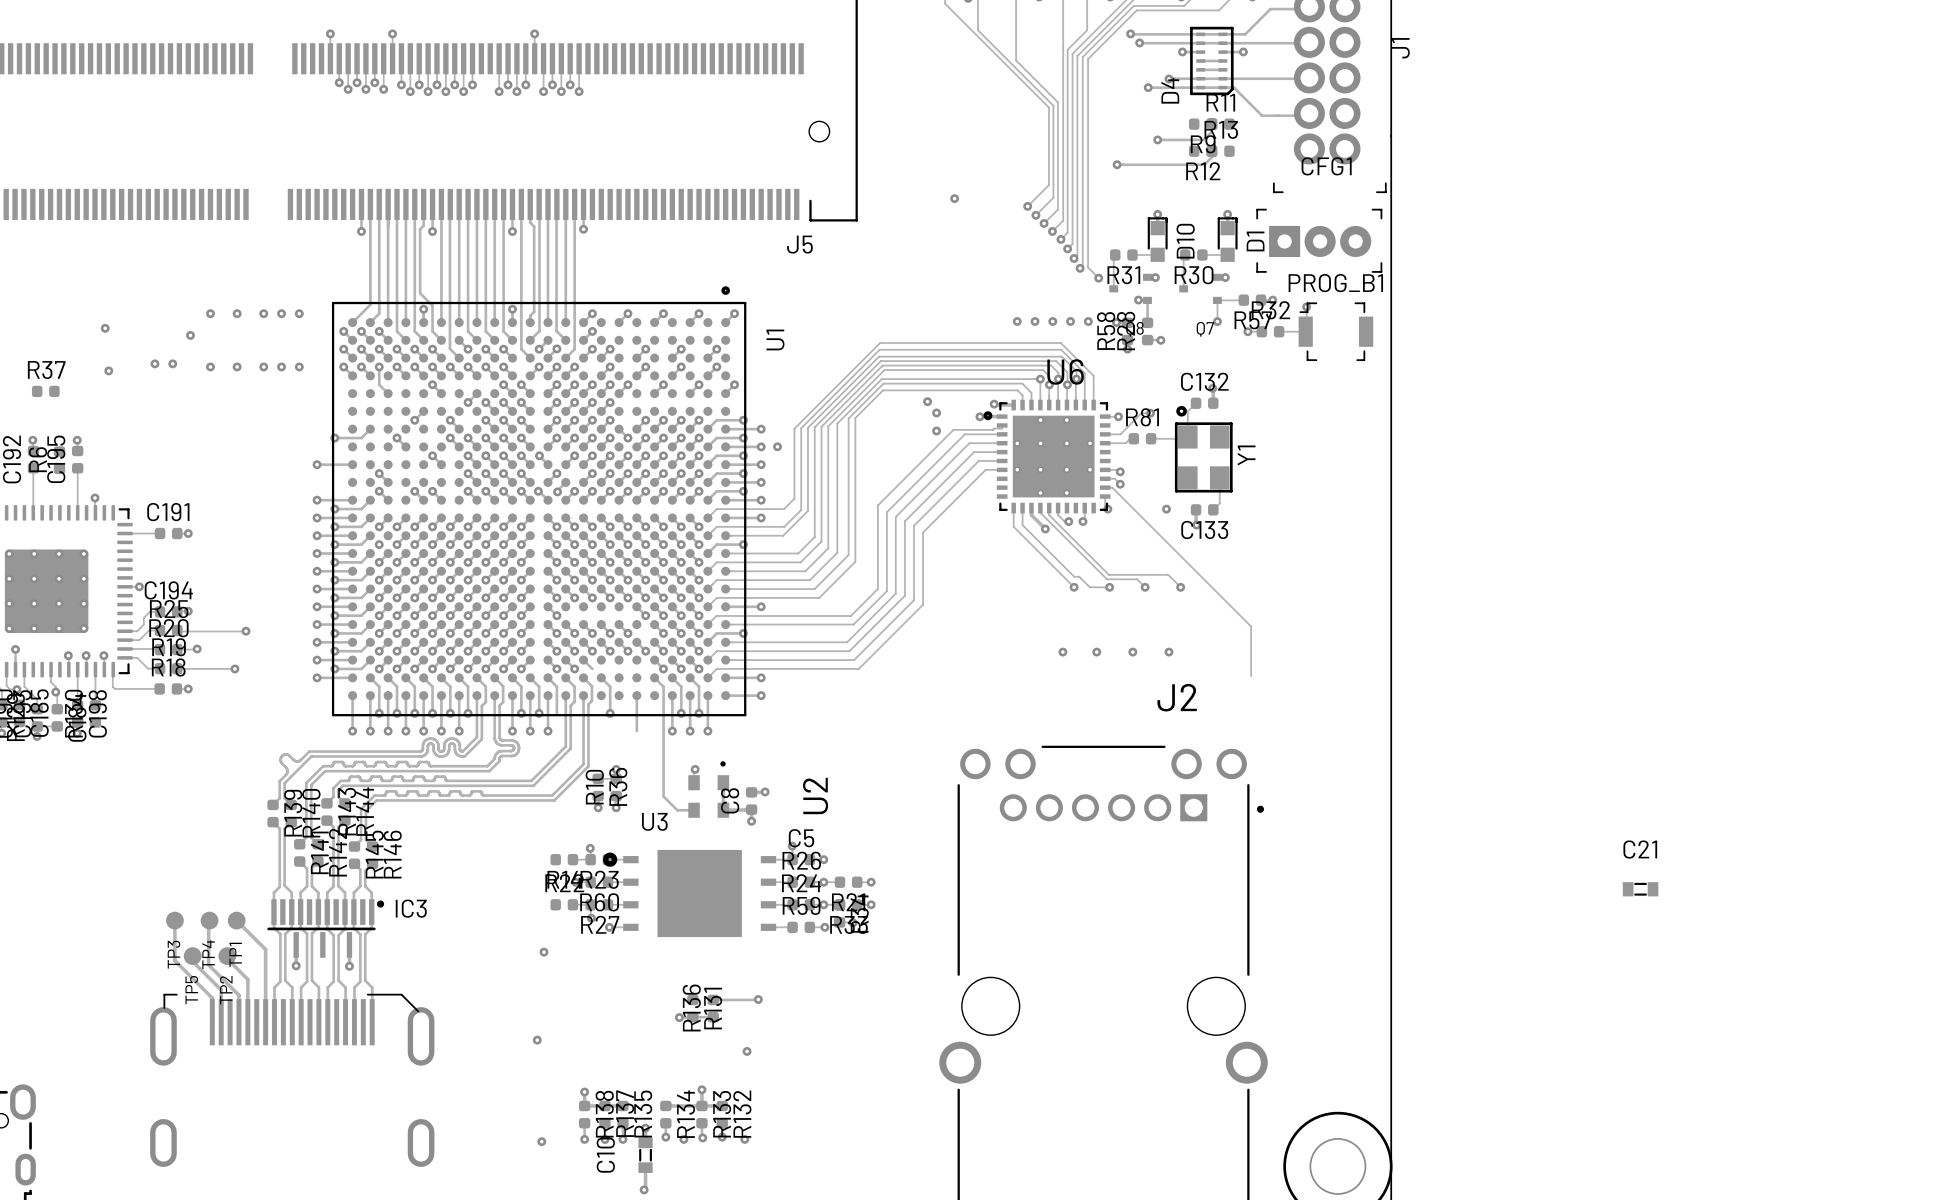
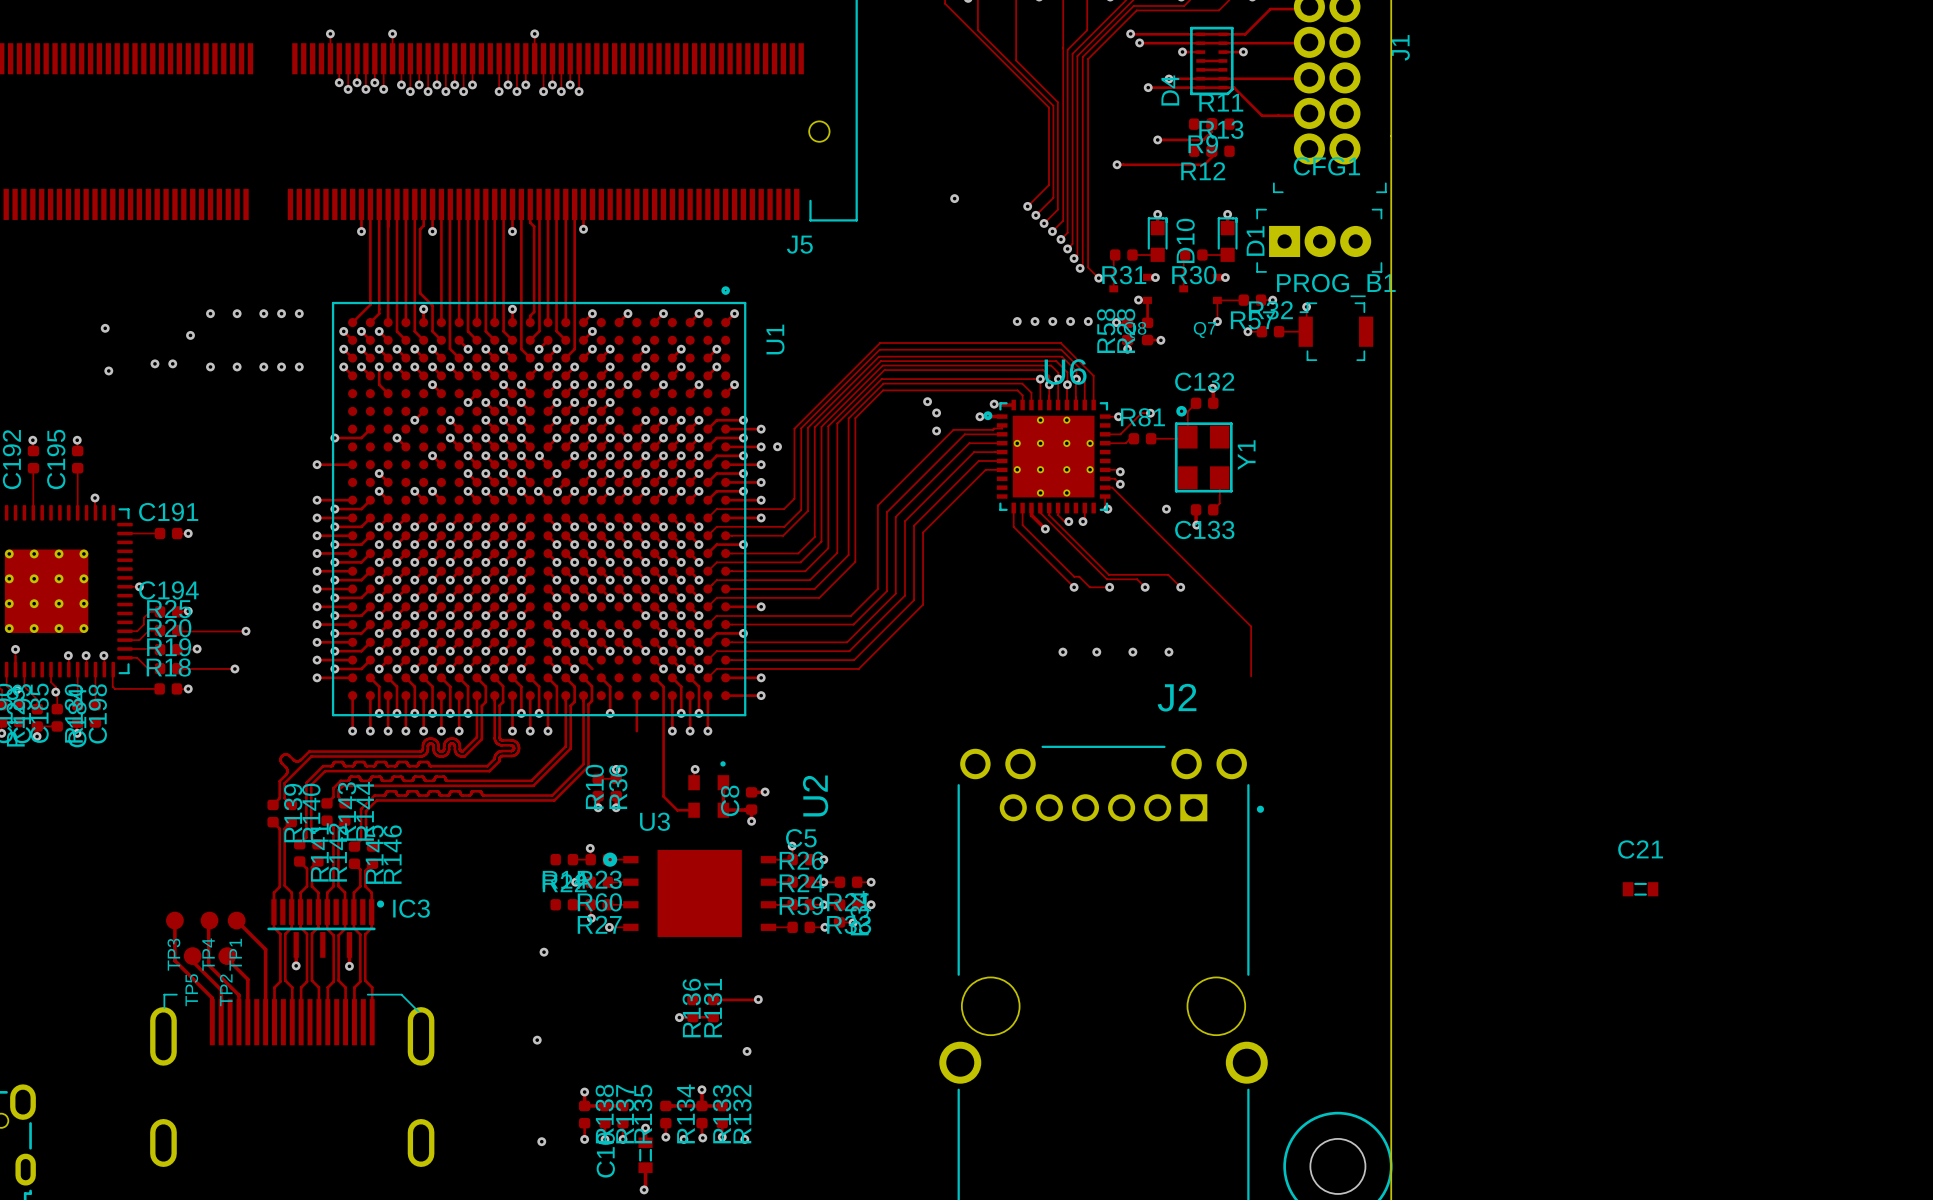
R37: (45, 391) -> none
R6: (59, 460) -> none

